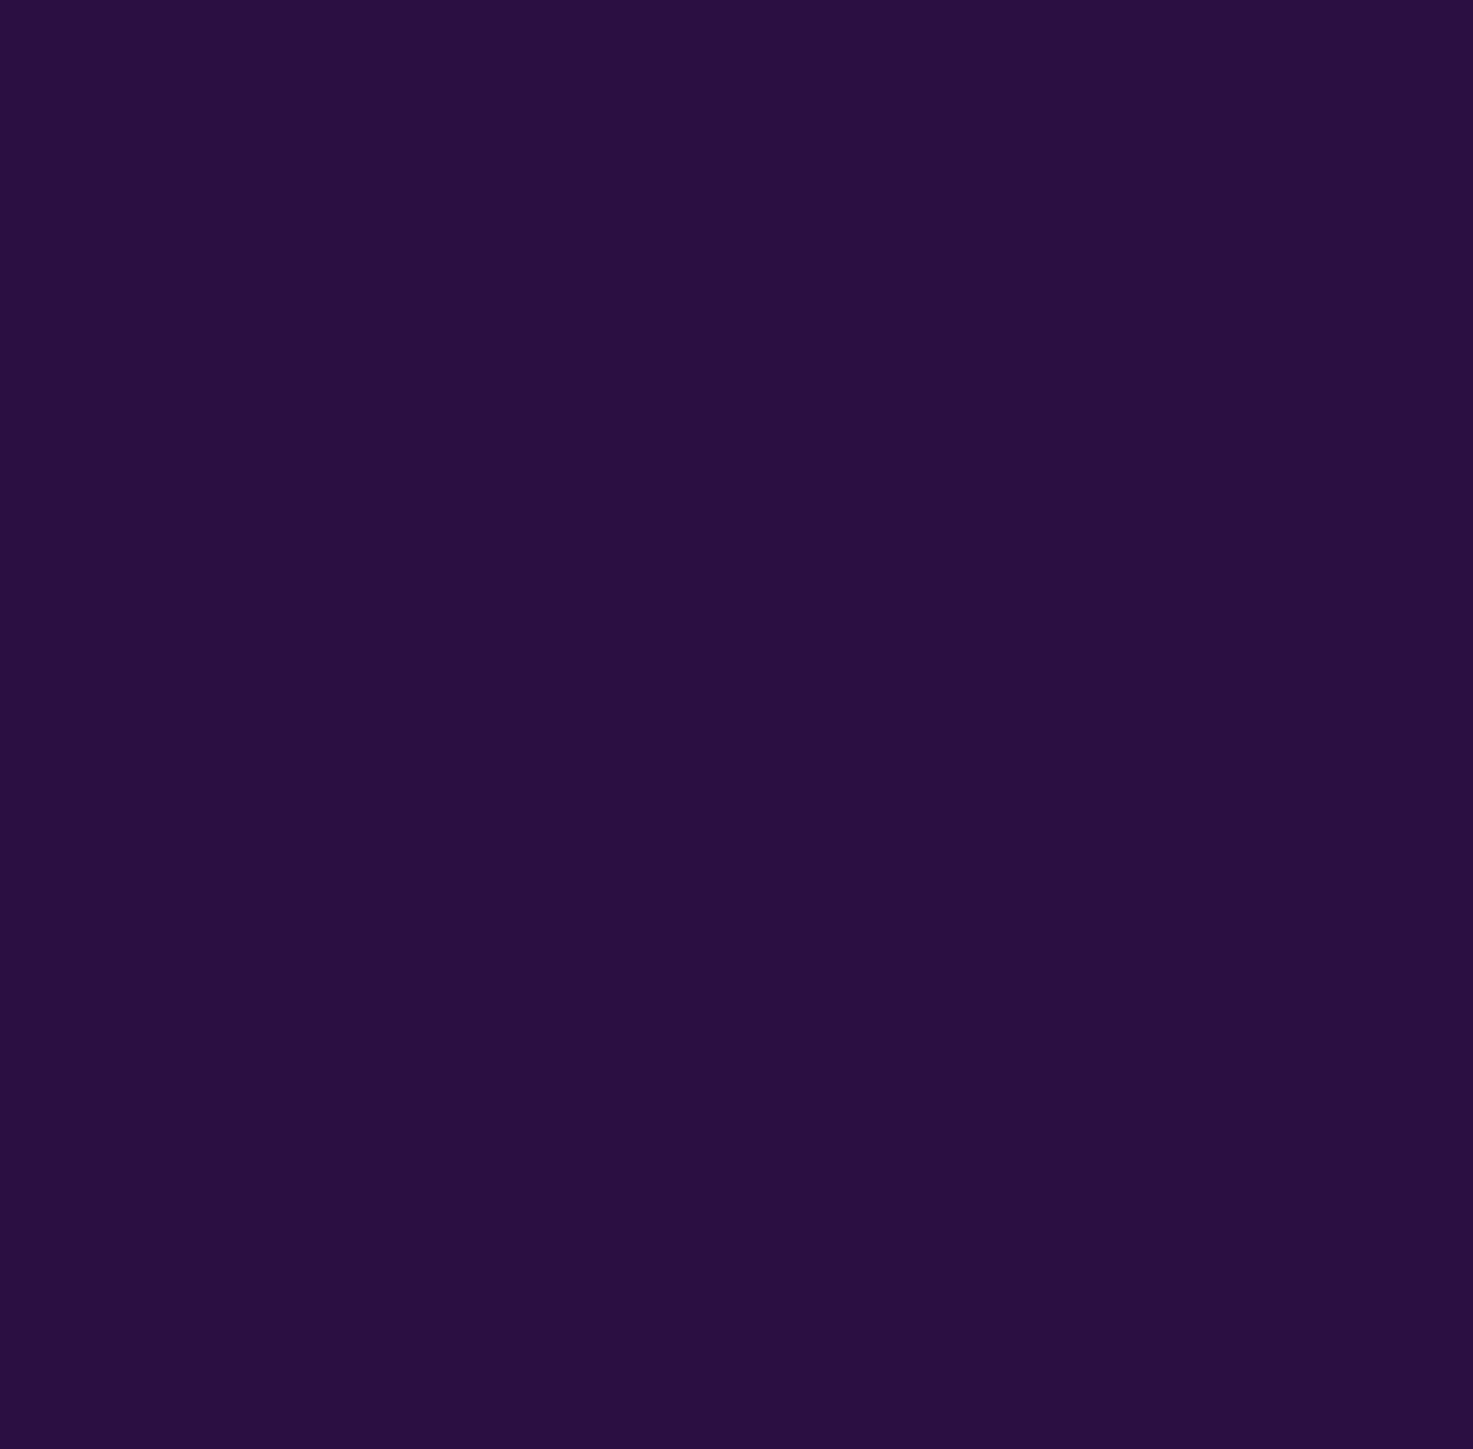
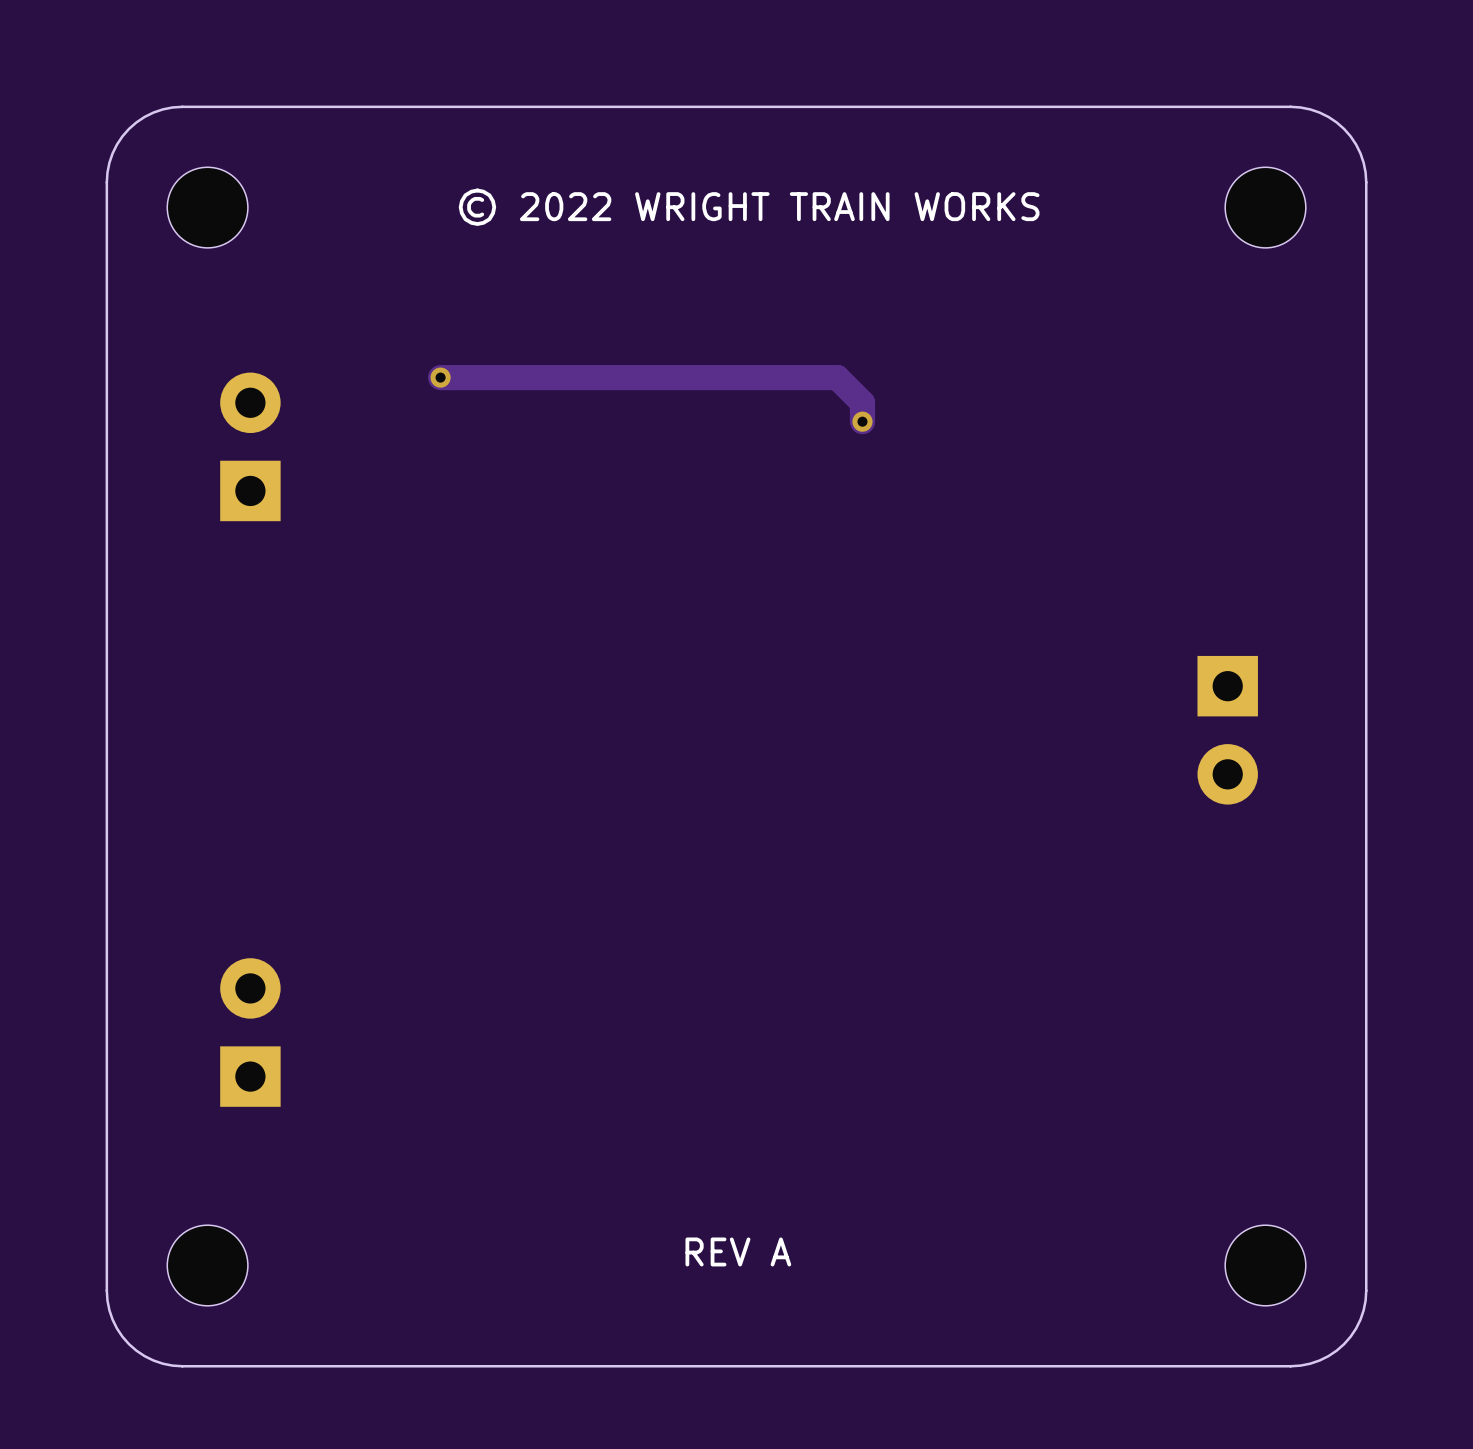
board edge: none -> (1290, 106) (182, 106) (153, 112) (128, 128) (112, 153) (106, 182) (106, 1290) (112, 1319) (128, 1344) (153, 1360) (182, 1366) (1290, 1366) (1319, 1360) (1344, 1344) (1360, 1319) (1366, 1290) (1366, 182) (1360, 153) (1344, 128) (1319, 112) (1290, 106)
part: none -> (207, 207)
text: none -> © 2022 WRIGHT TRAIN WORKS (749, 207)
part: none -> (1265, 207)
track: none -> (440, 377) (837, 377) (862, 402) (862, 421)
via: none -> (440, 377)
via: none -> (862, 421)
part: none -> (250, 446)
part: none -> (1227, 730)
part: none -> (250, 1032)
text: none -> REV A (738, 1251)
part: none -> (207, 1265)
part: none -> (1265, 1265)

